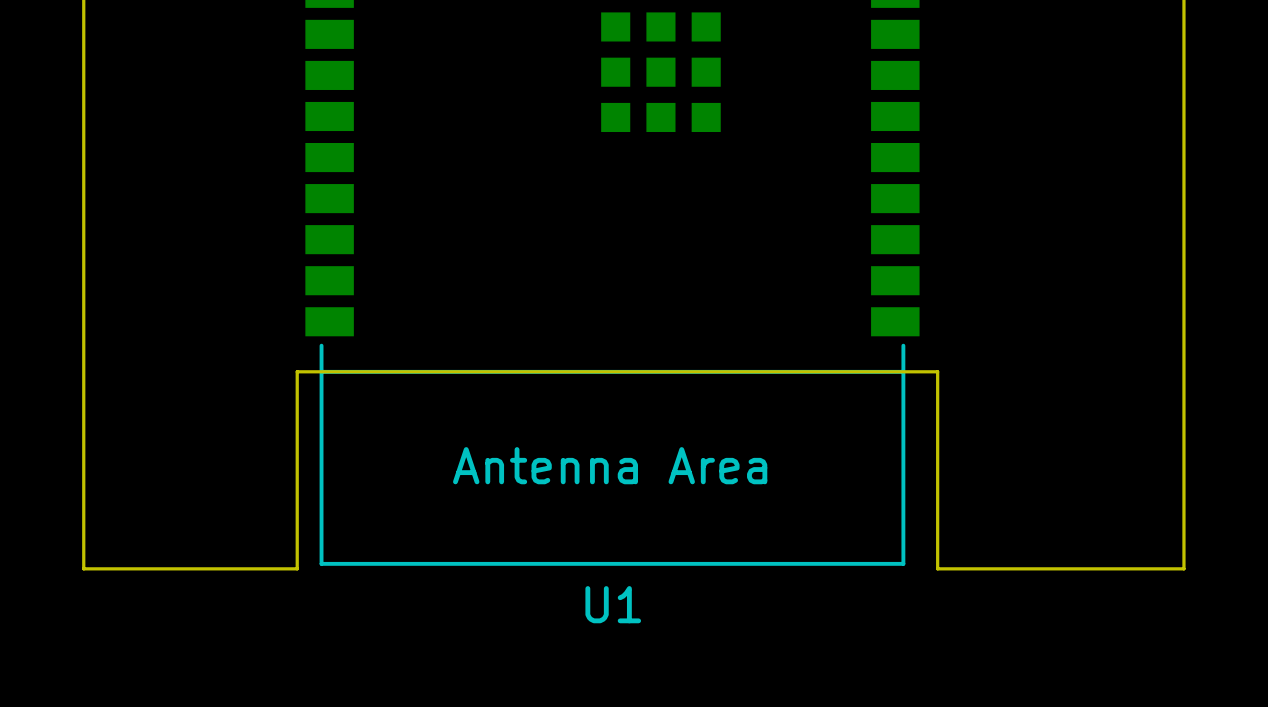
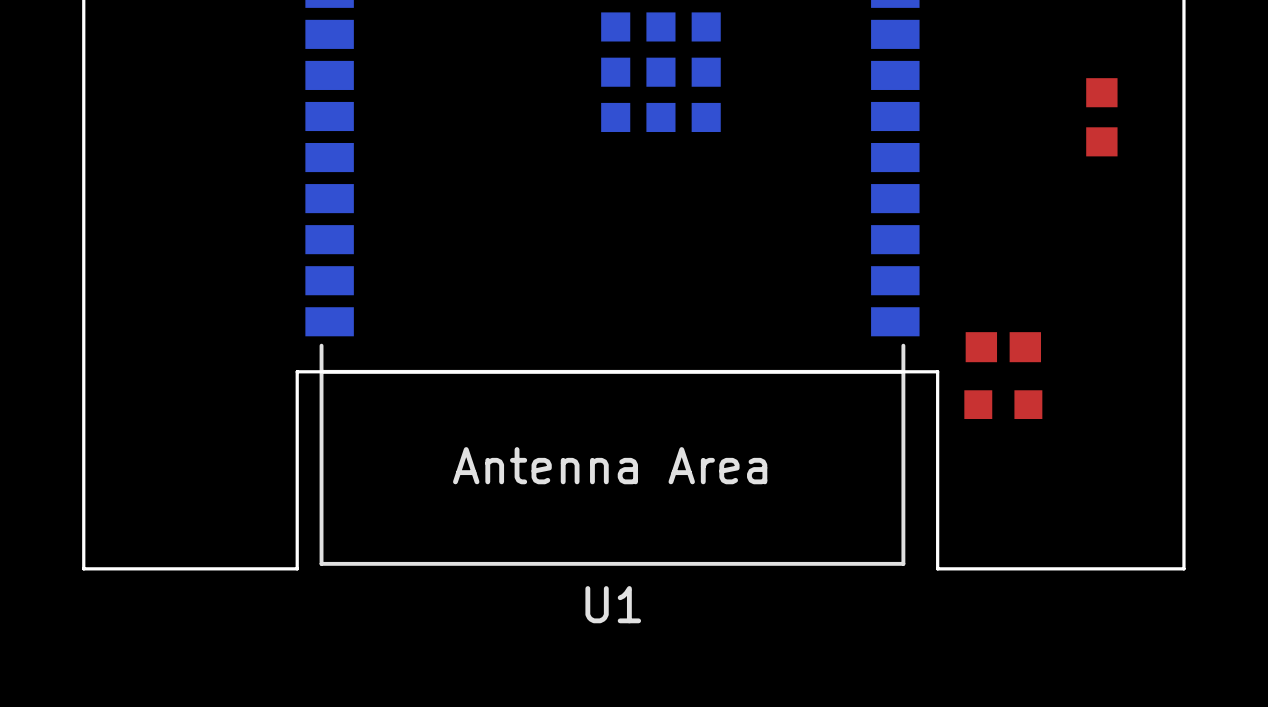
part: none -> (1101, 117)
part: none -> (1003, 347)
part: none -> (1003, 404)

